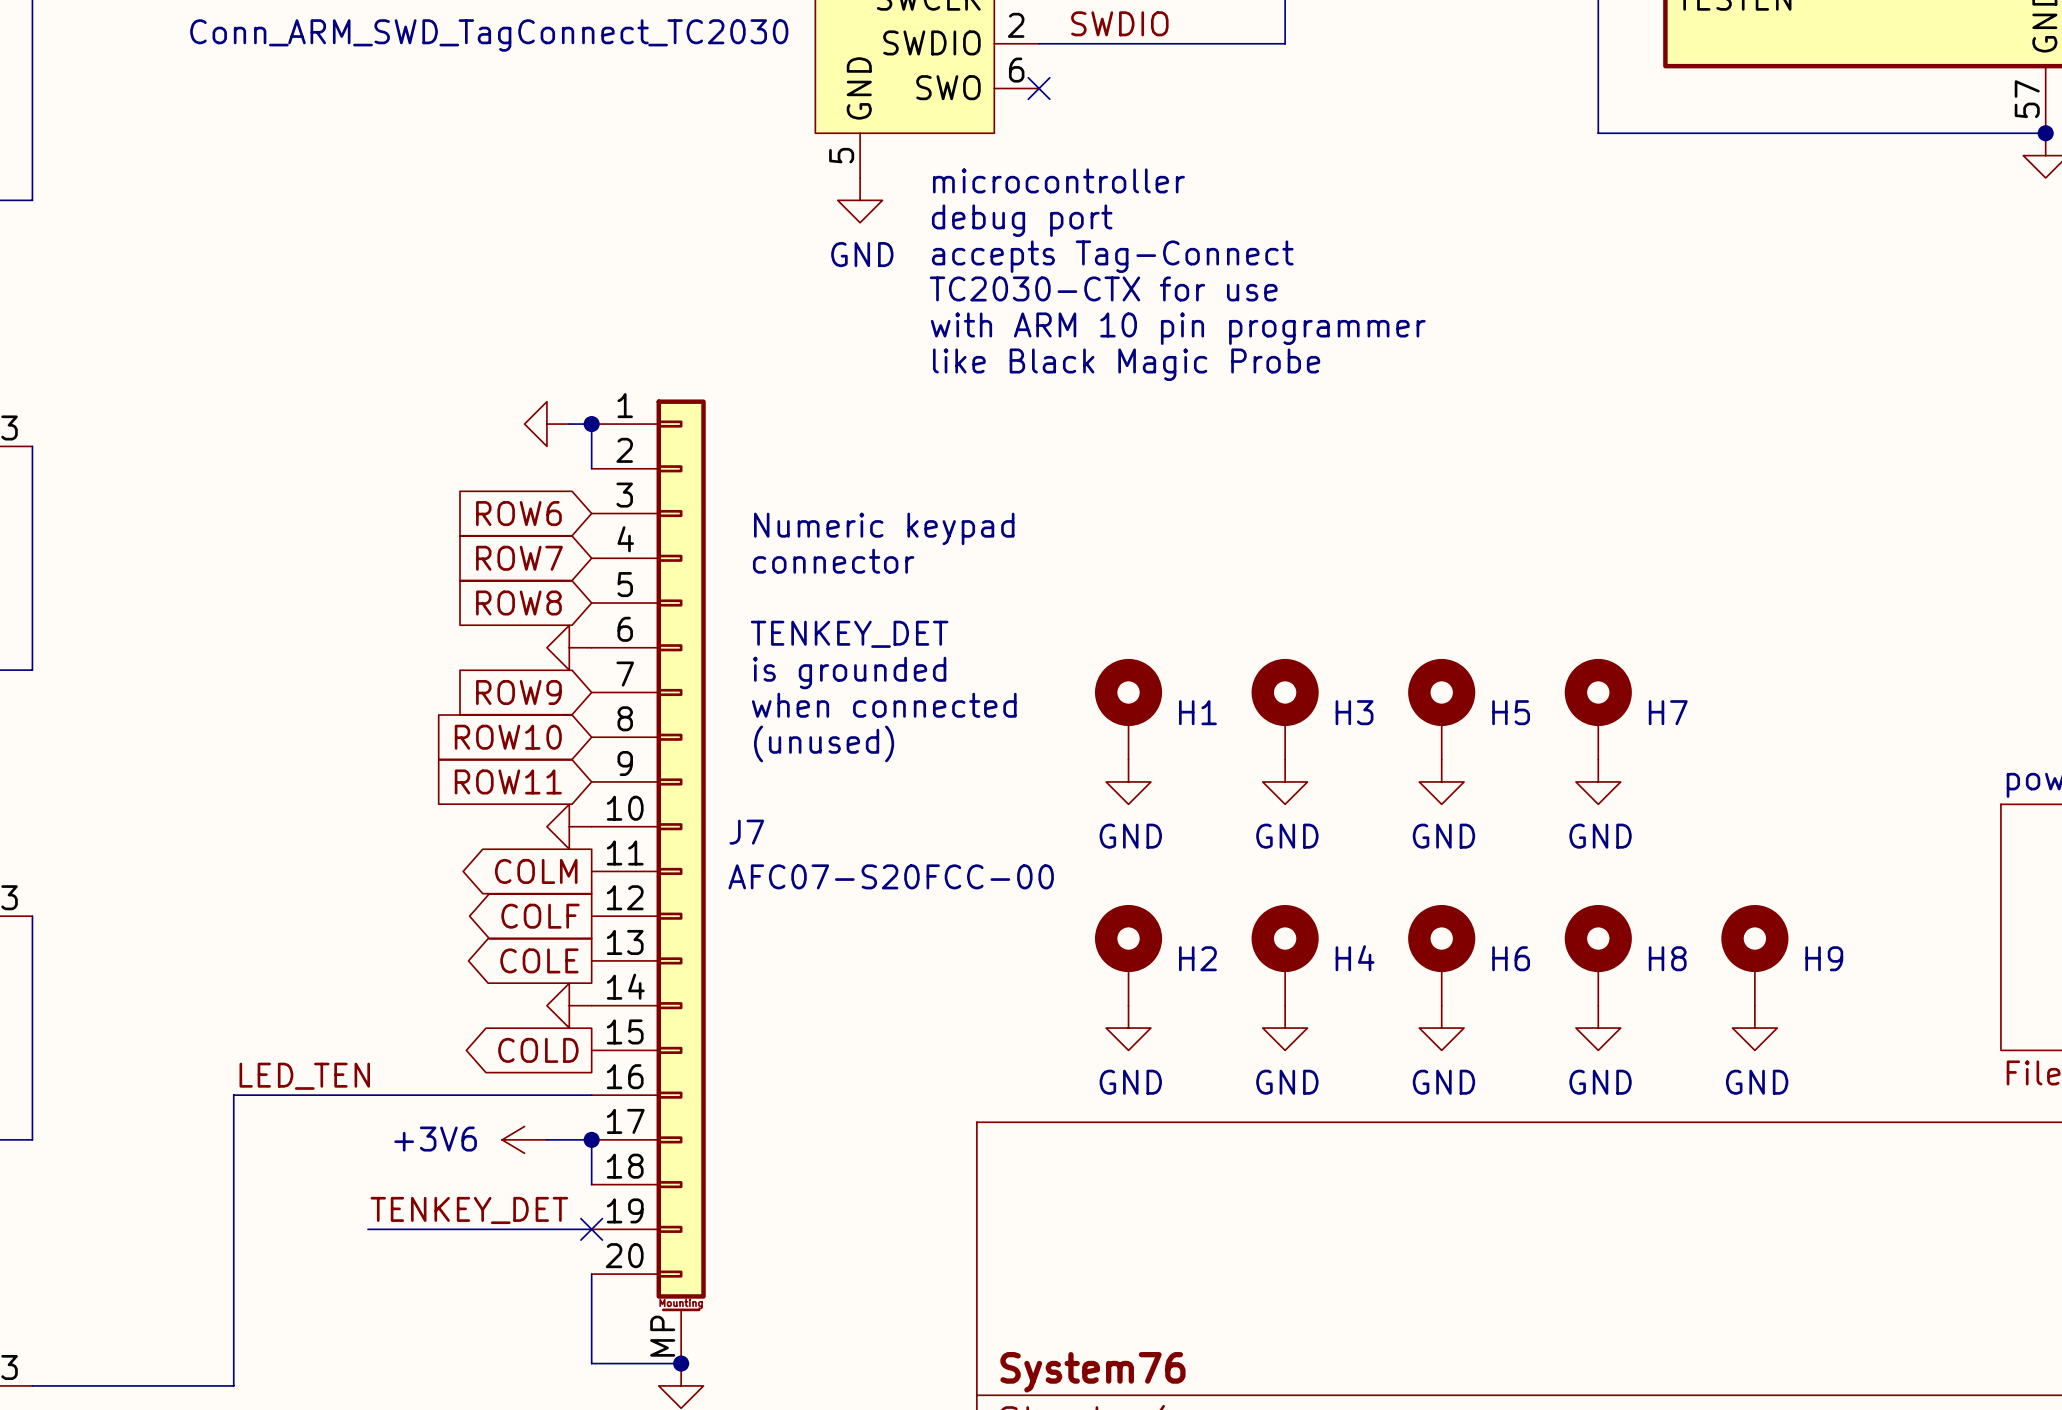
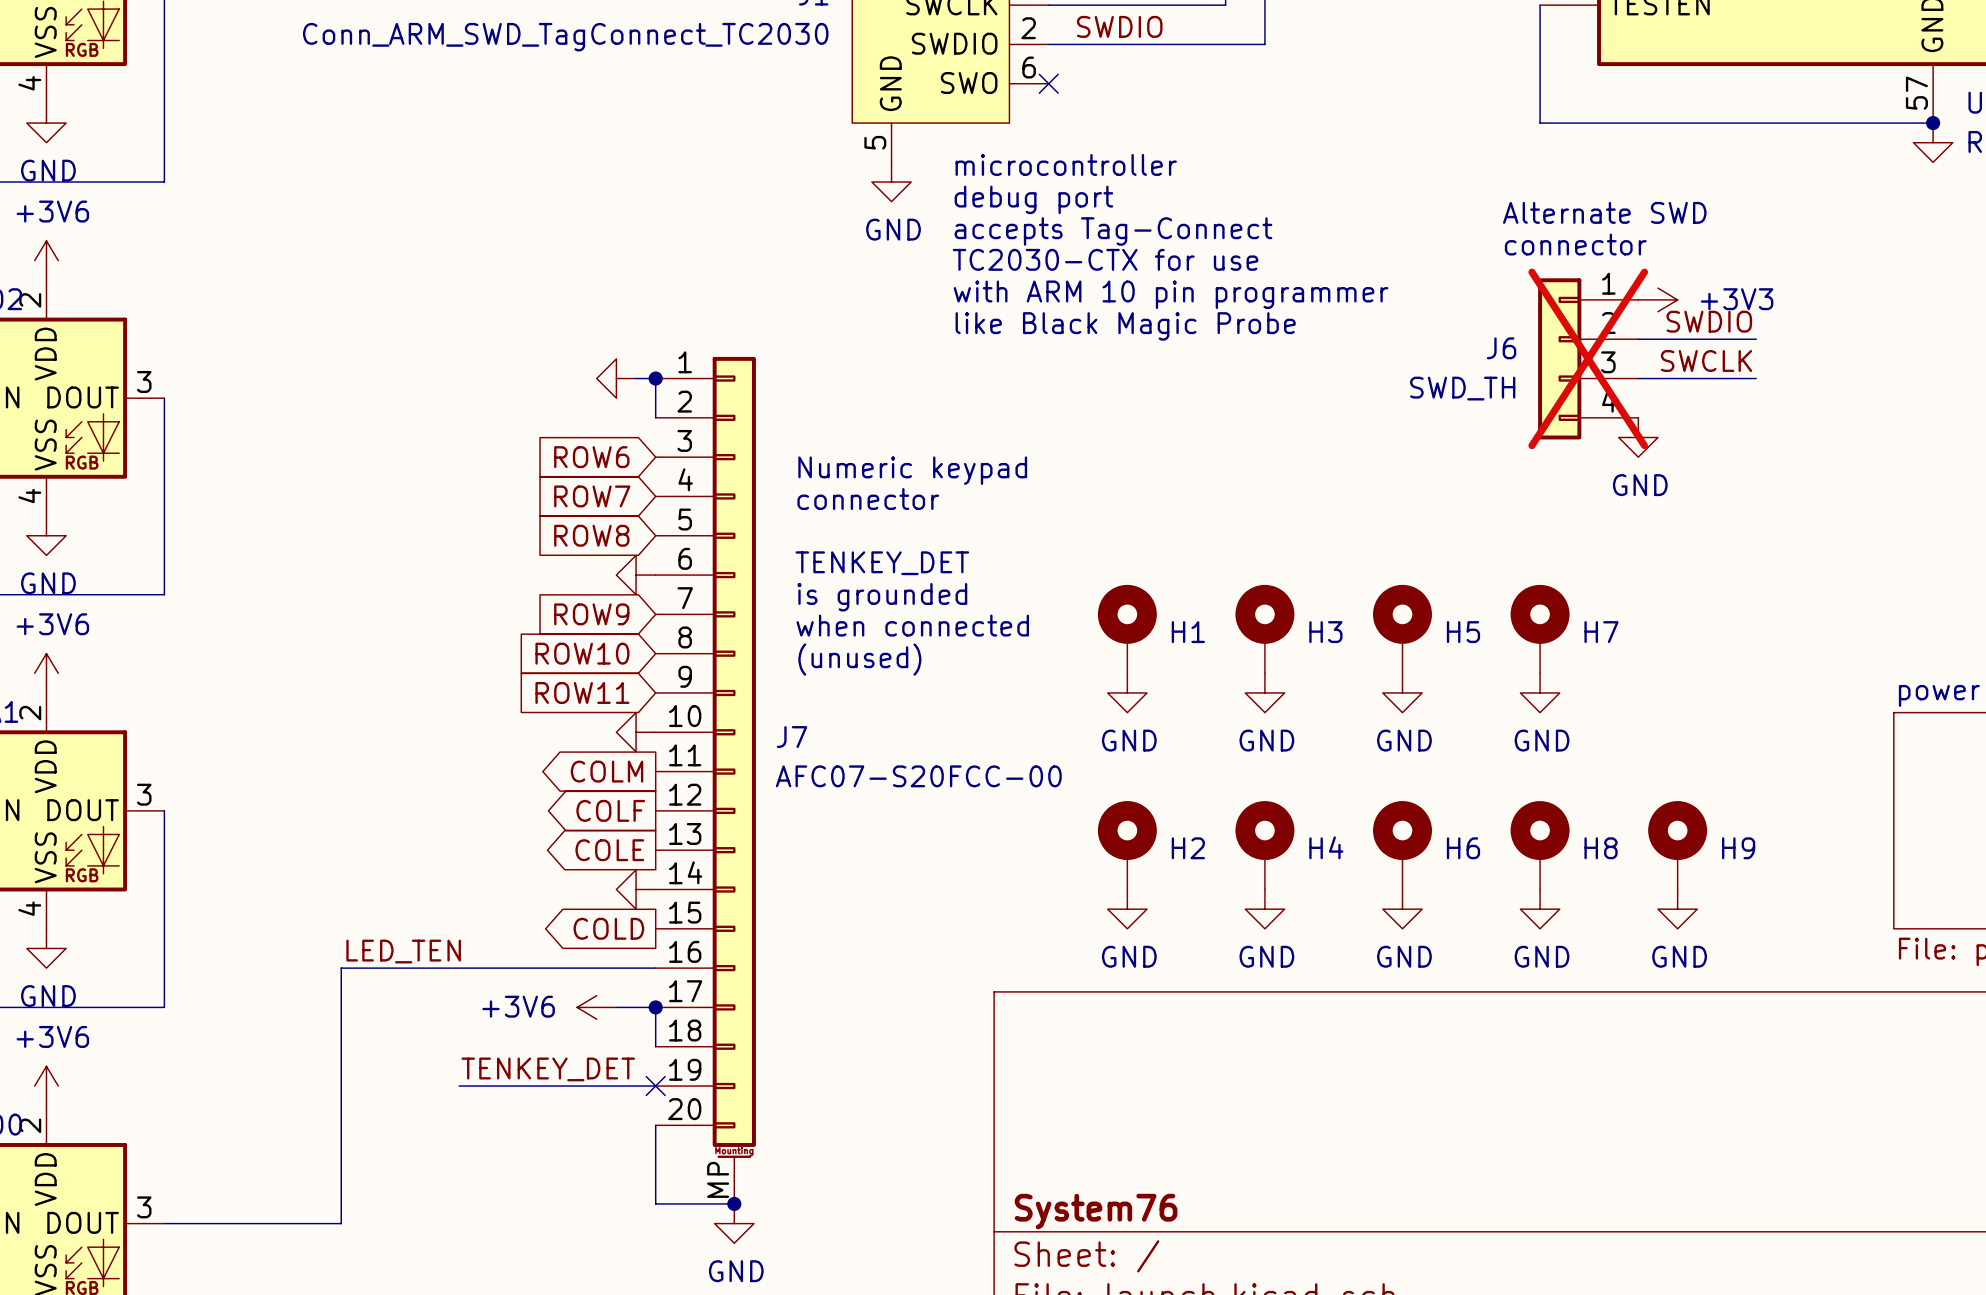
text: none -> Alternate SWD (1604, 212)
text: none -> connector (1575, 244)
power symbol: none -> +3V3 (1657, 299)
label: none -> SWDIO (1709, 321)
wire: none -> (1638, 339) (1756, 339)
J6: none -> SWD_TH (1588, 358)
label: none -> SWCLK (1706, 361)
wire: none -> (1638, 378) (1756, 378)
power symbol: none -> GND (1638, 437)

